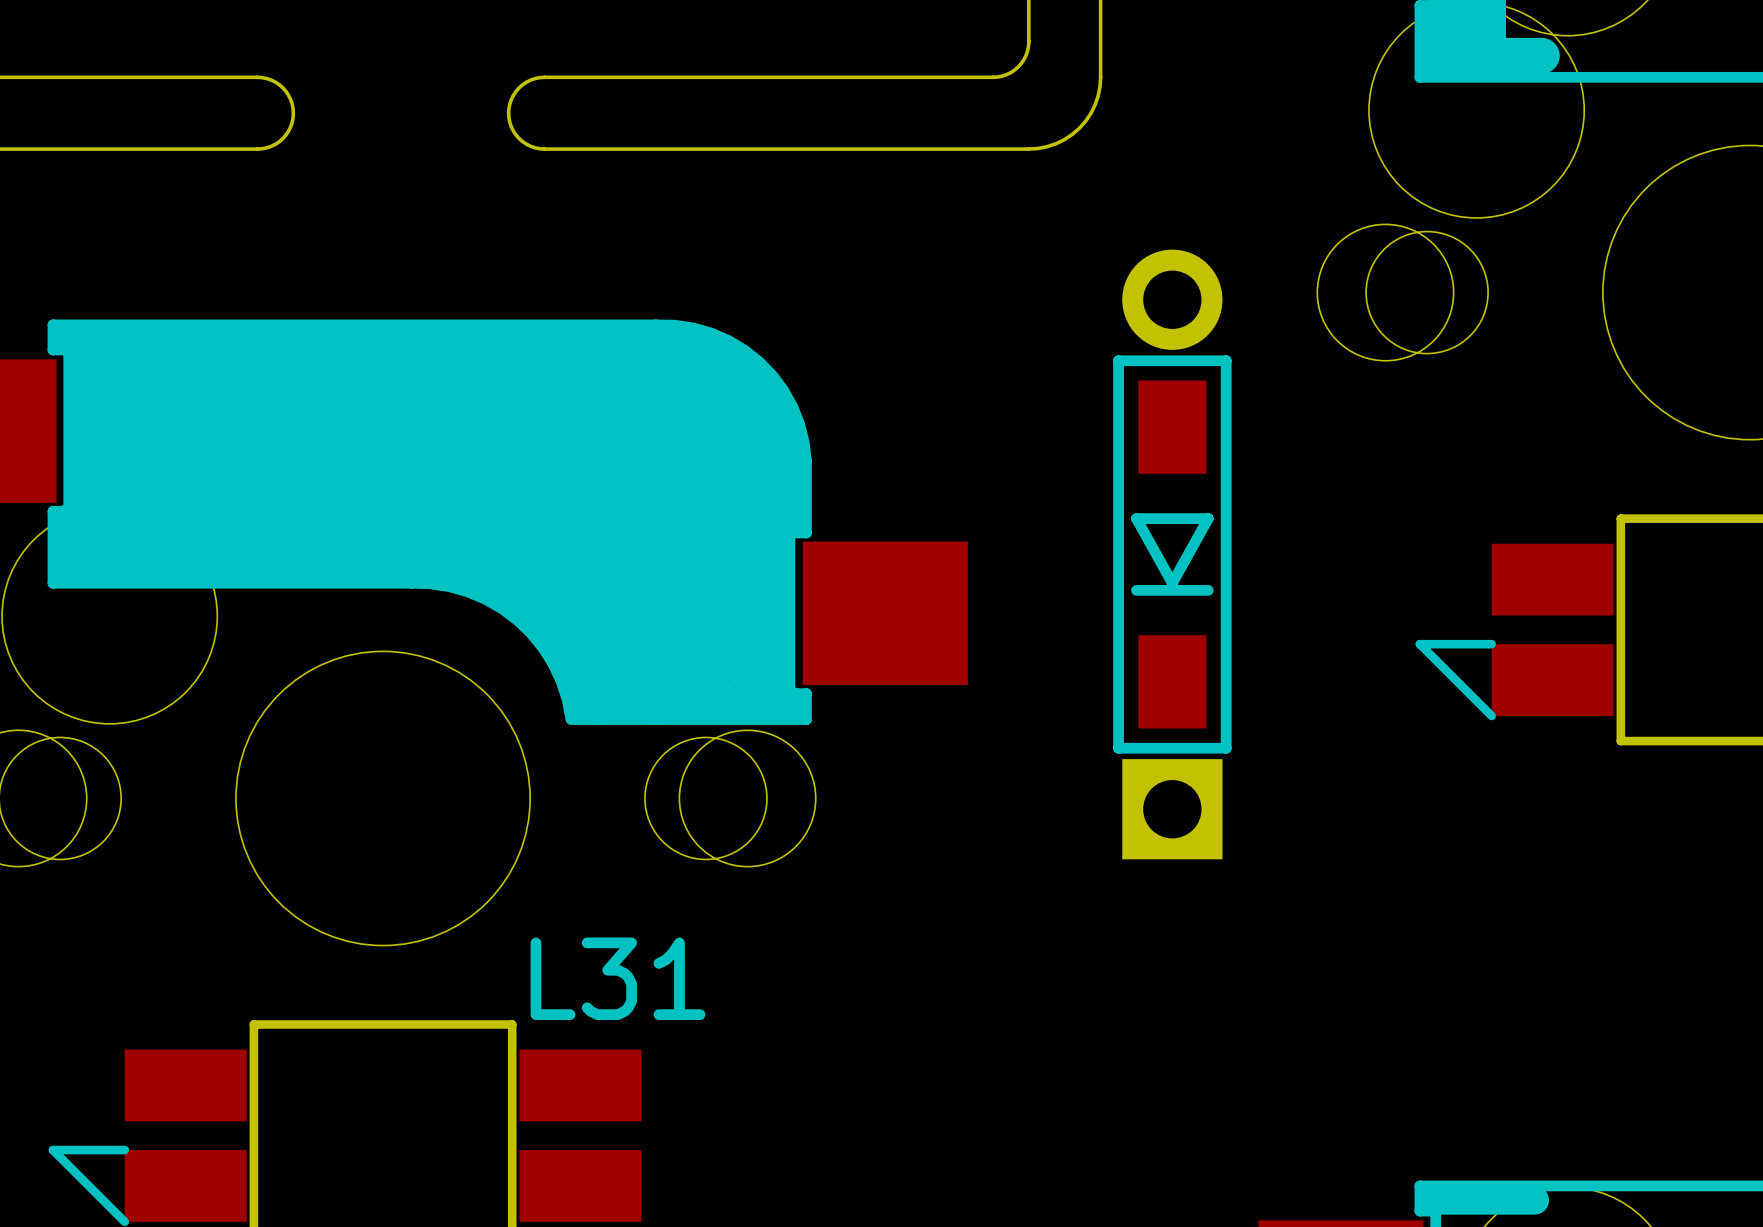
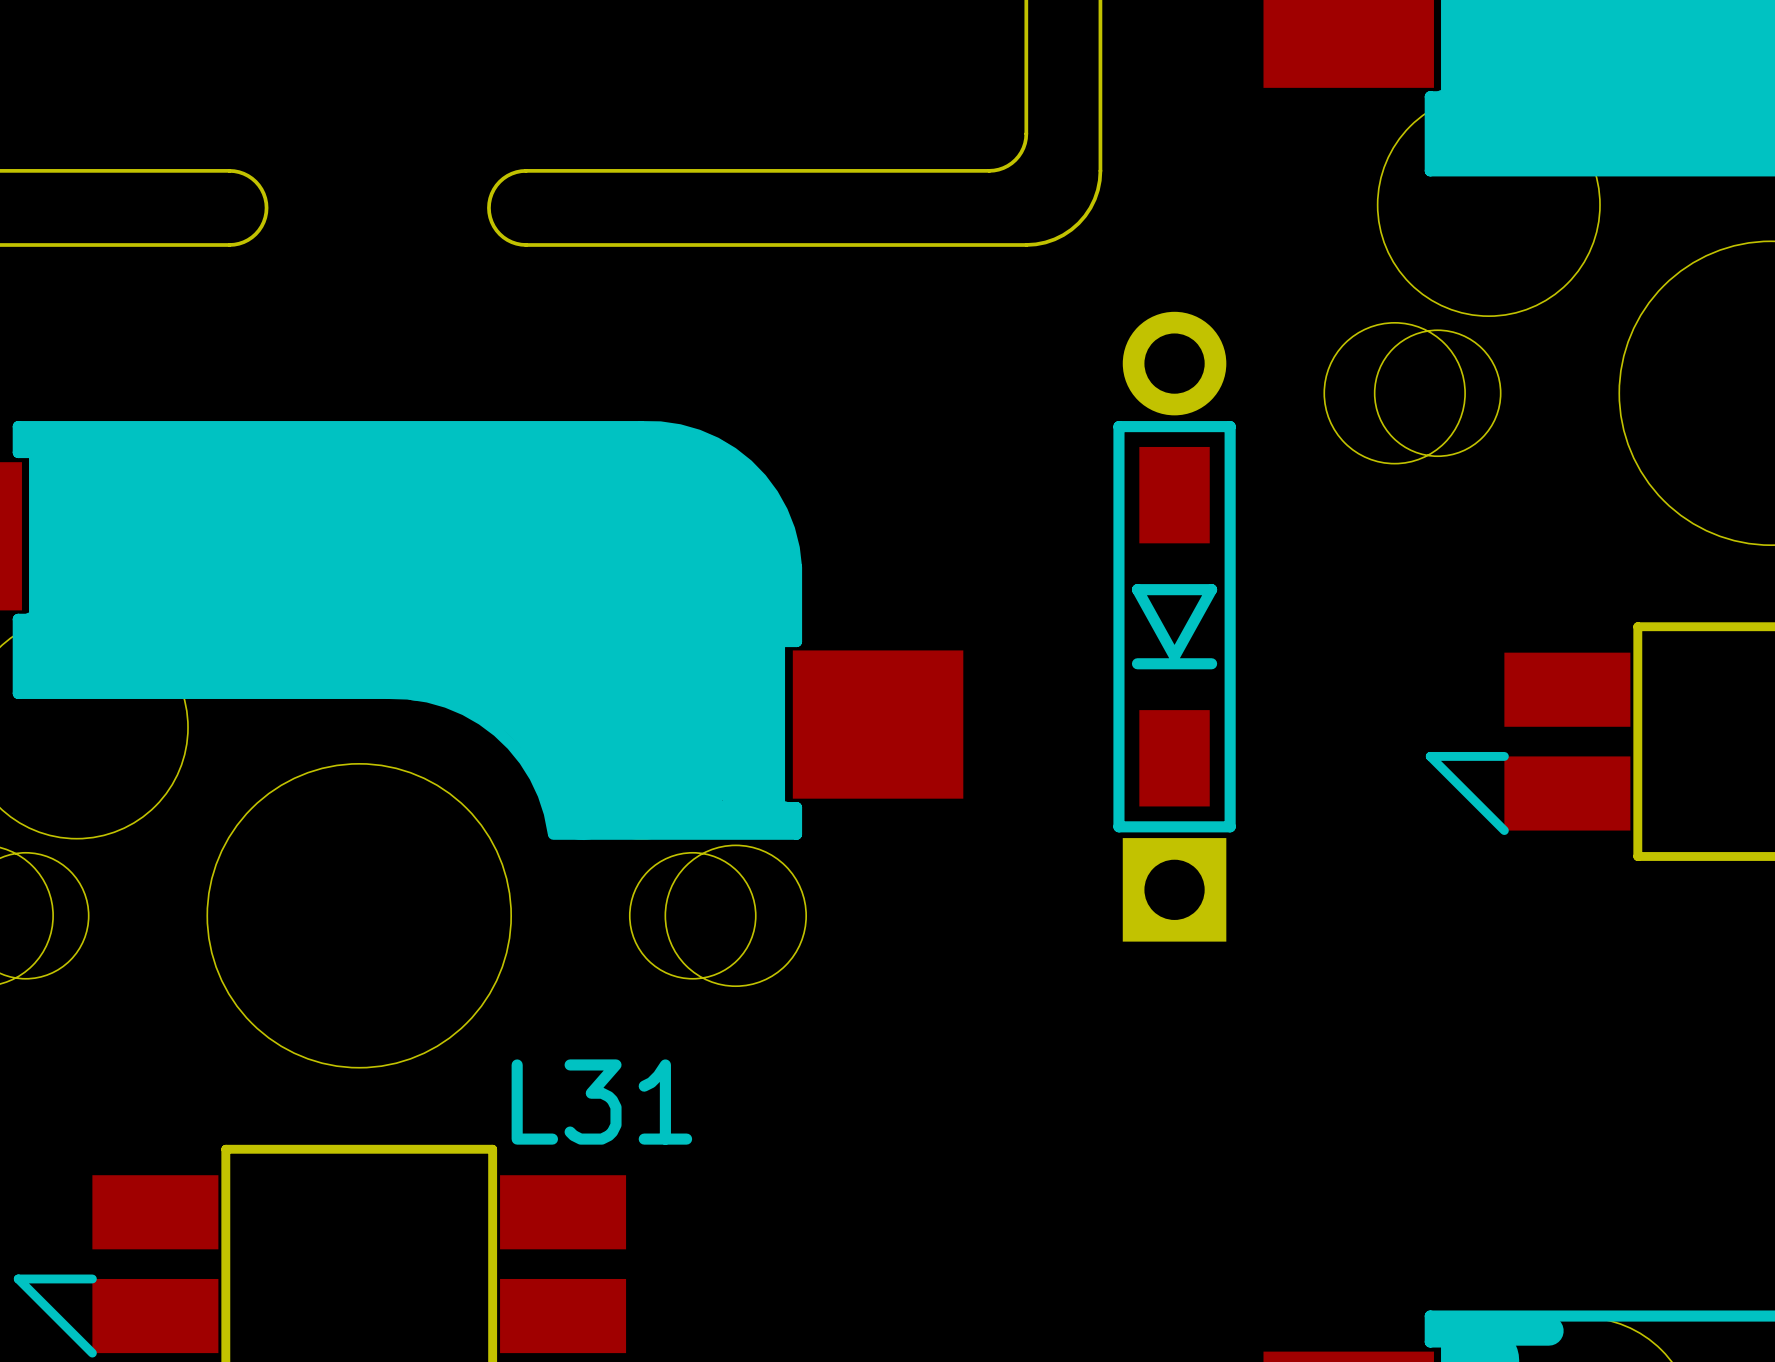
part position: (1172, 554) -> (1174, 626)

